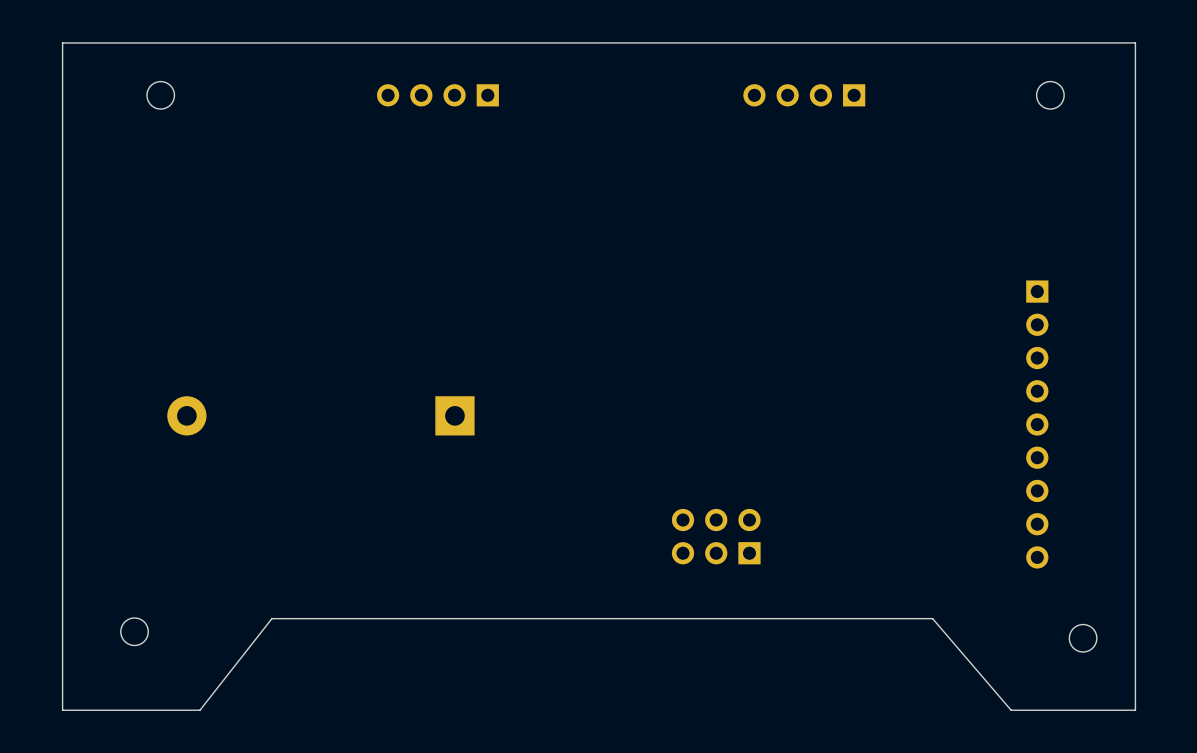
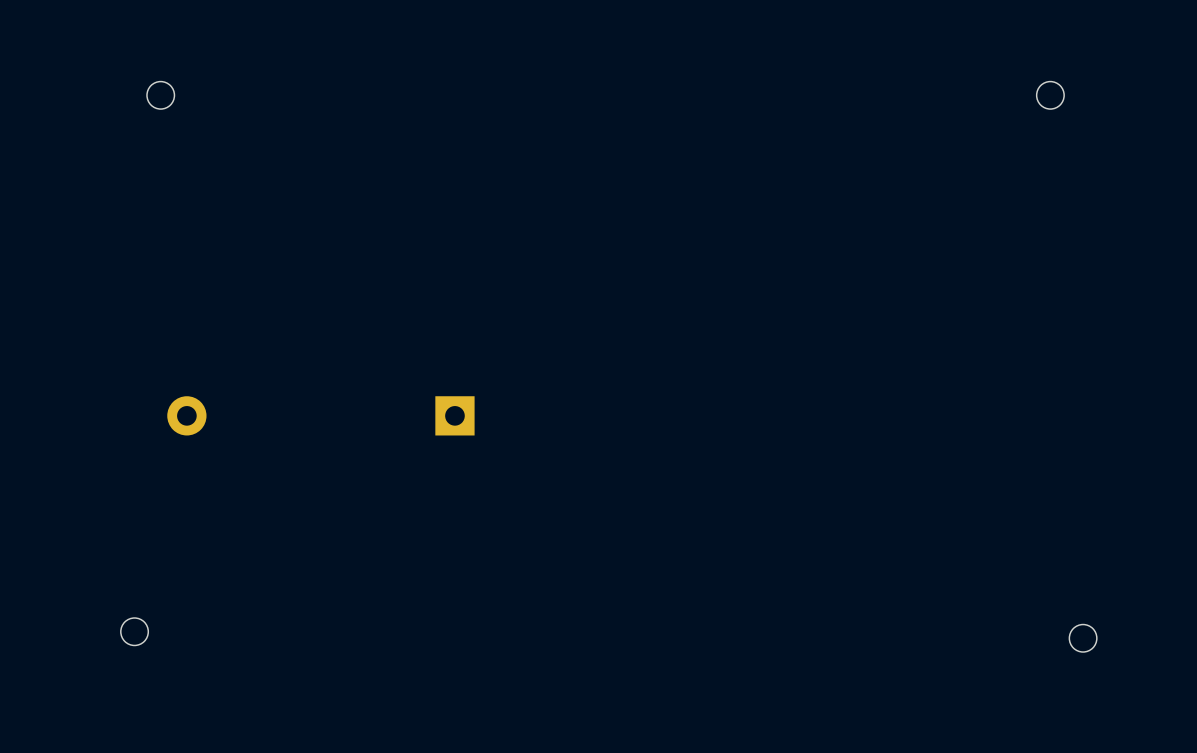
board edge: (1135, 42) (1135, 710) (1011, 710) (932, 618) (271, 618) (199, 710) (62, 710) (62, 42) (1135, 42) -> none
part: (437, 95) -> none
part: (804, 95) -> none
part: (1037, 424) -> none
part: (716, 536) -> none

